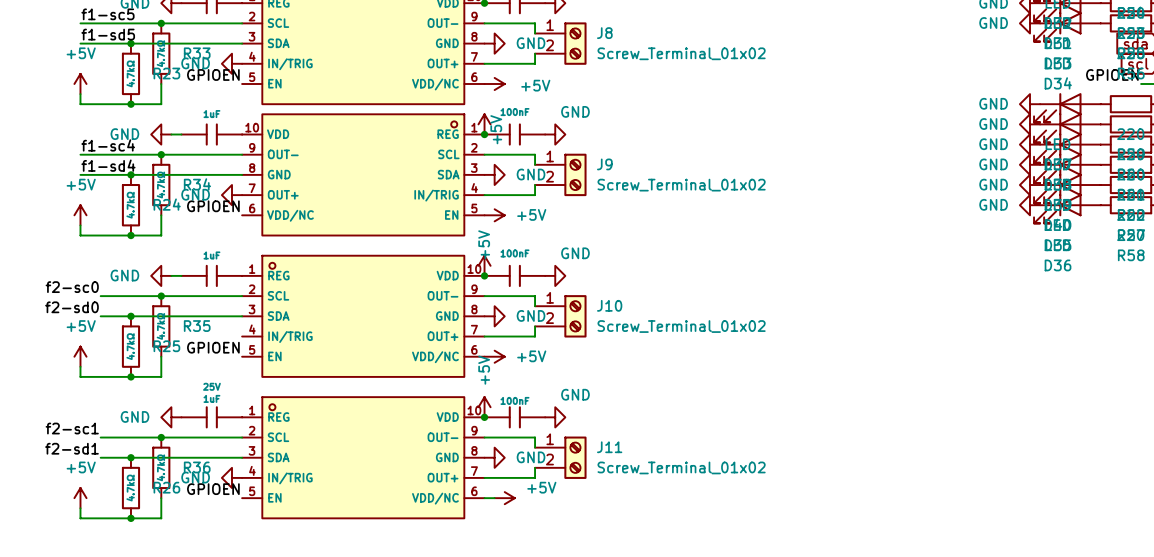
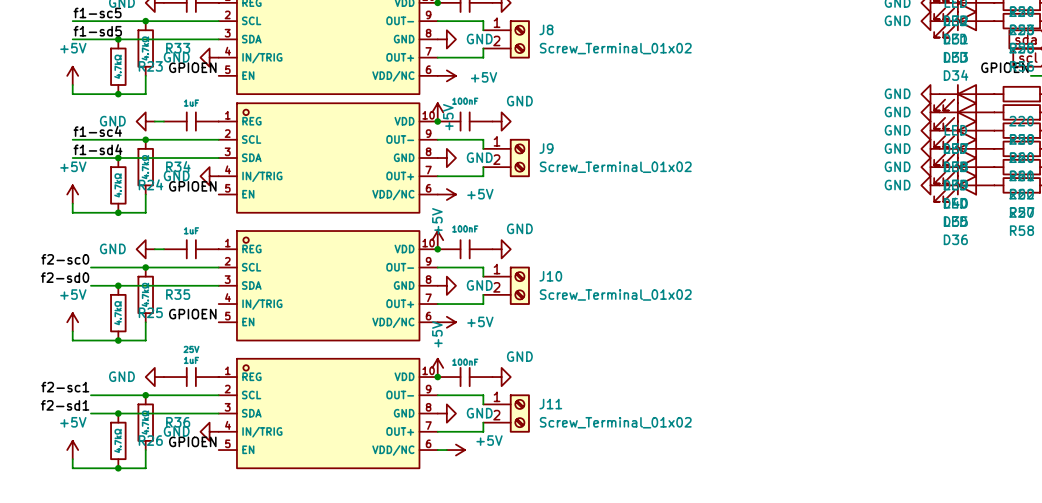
part flip: as is (363, 174) -> left-right (328, 158)

